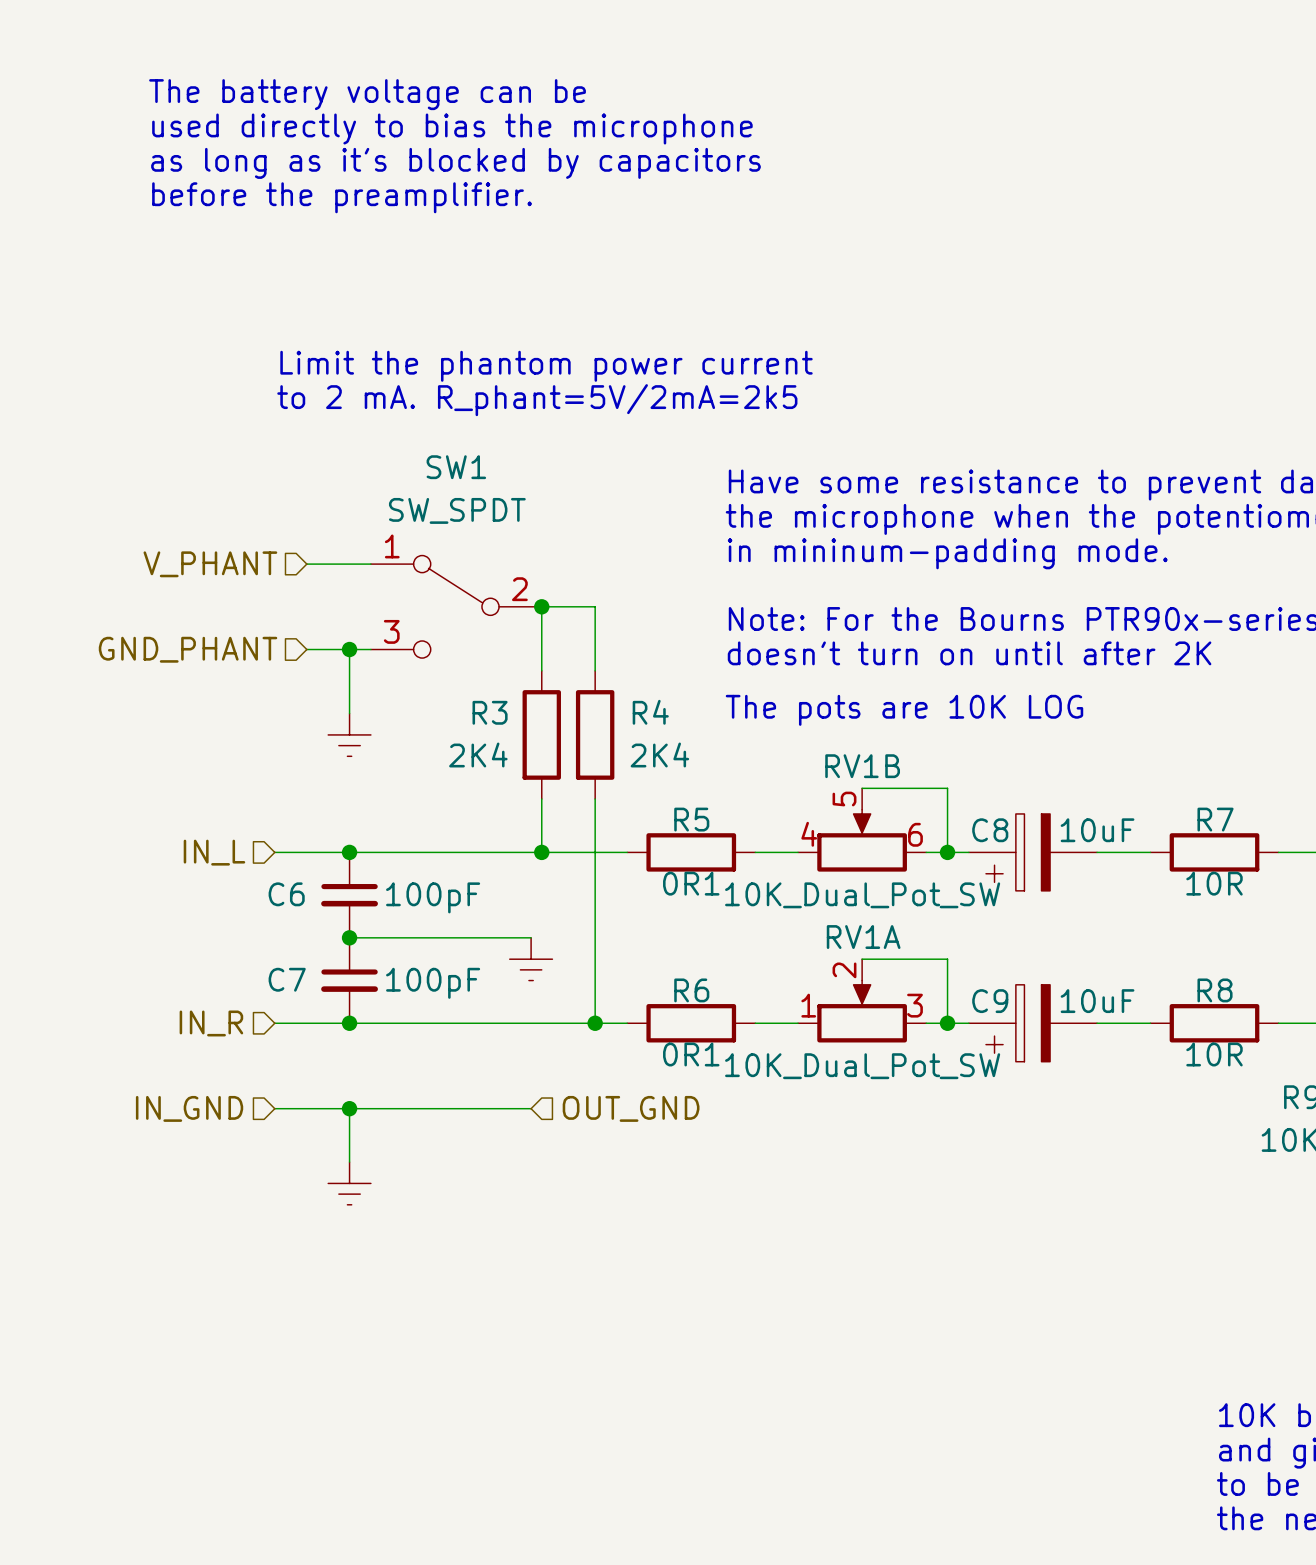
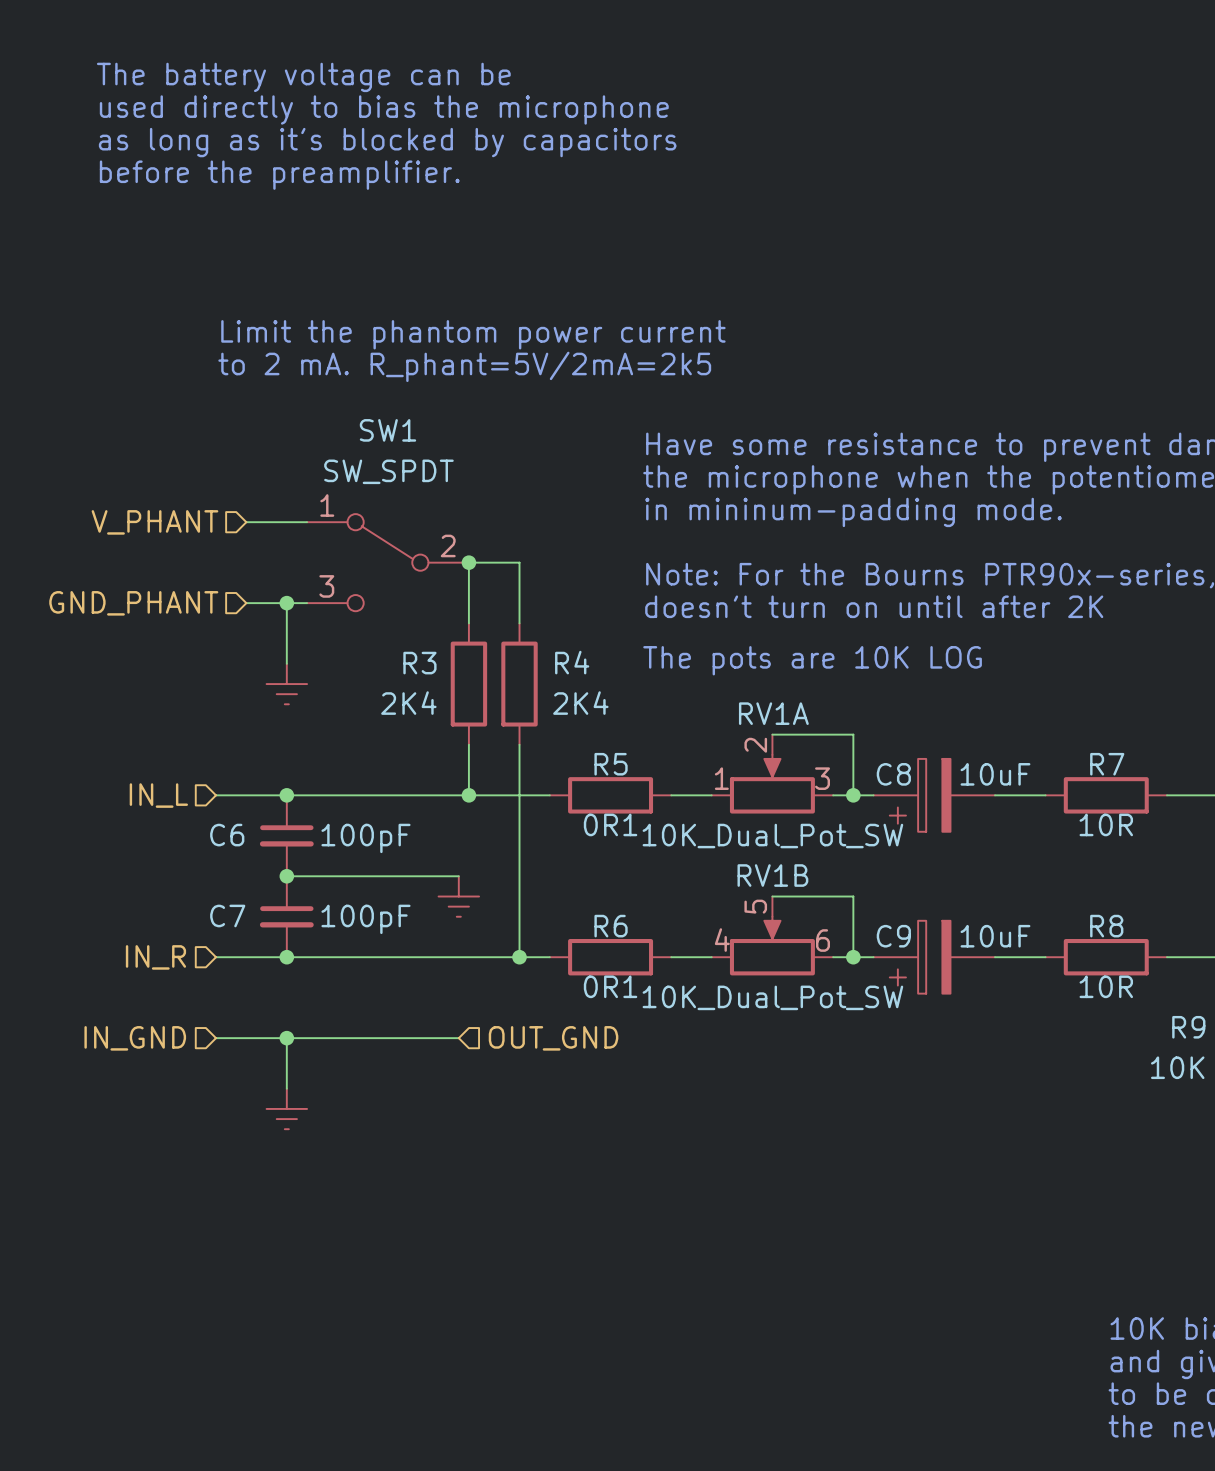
RV1B position: (862, 829) -> (772, 935)
RV1A position: (862, 1000) -> (772, 774)

